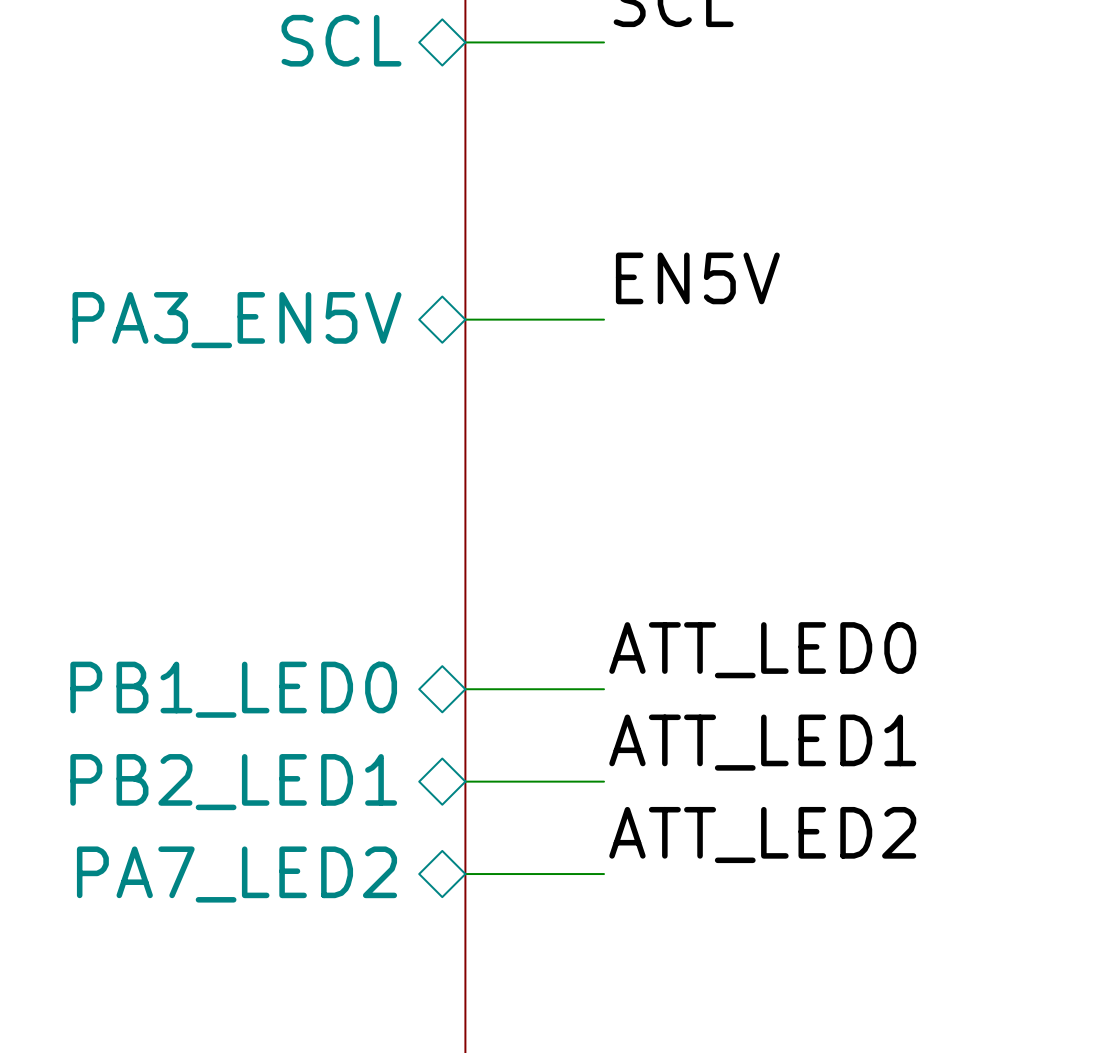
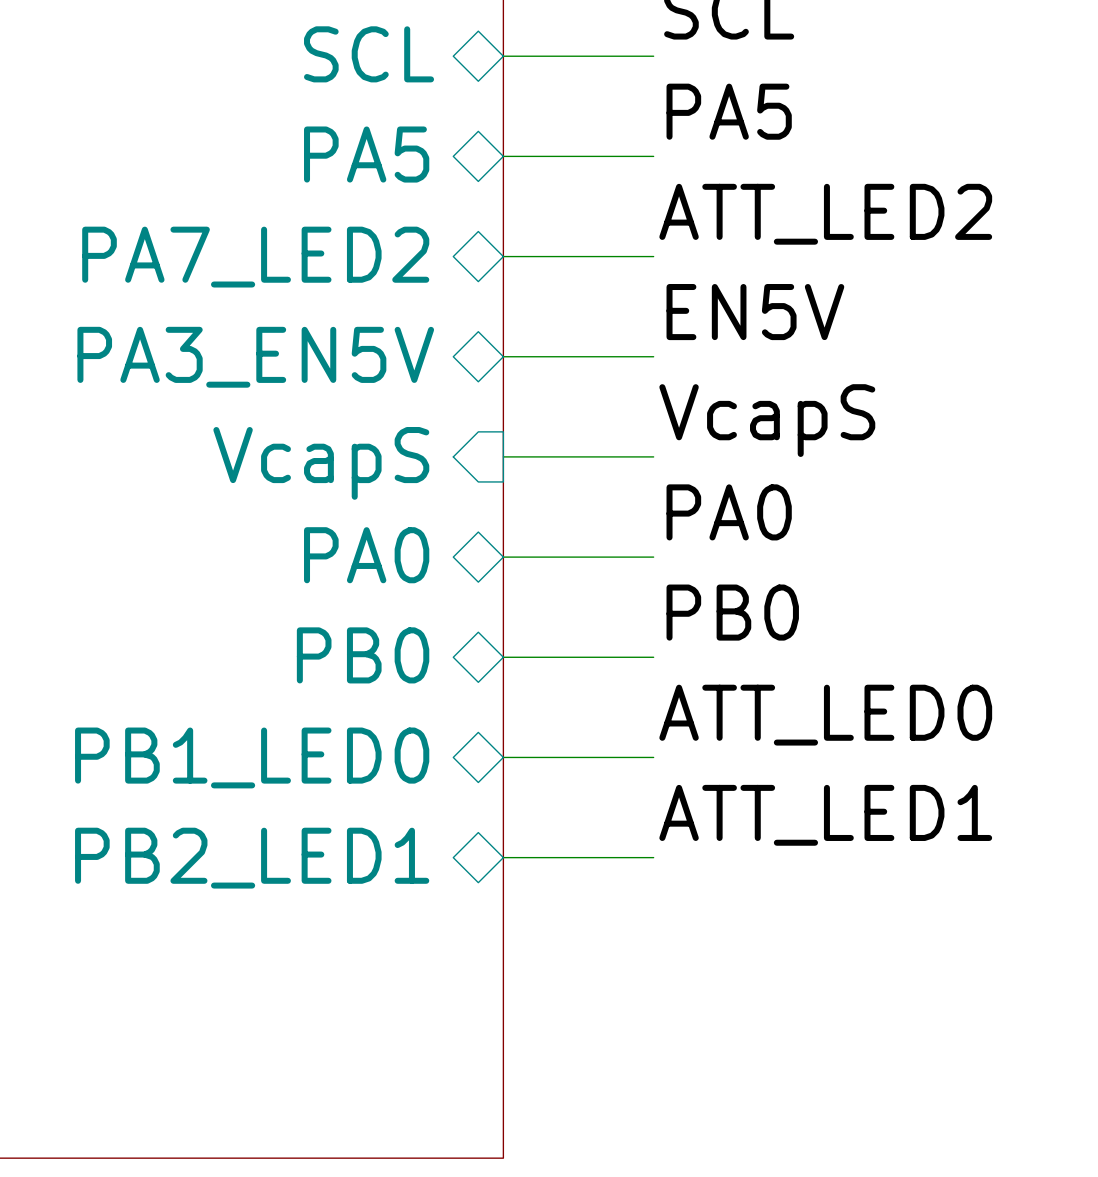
label: none -> PA5 (729, 111)
sheet pin: none -> PA5 (366, 154)
wire: none -> (503, 156) (653, 156)
wire: none -> (503, 256) (653, 256)
label: none -> VcapS (767, 420)
wire: none -> (503, 456) (653, 456)
sheet pin: none -> VcapS (321, 463)
label: none -> PA0 (729, 512)
sheet pin: none -> PA0 (366, 555)
wire: none -> (503, 557) (653, 557)
label: none -> PB0 (732, 612)
sheet pin: none -> PB0 (363, 655)
label position: ATT_LED2 (762, 835) -> ATT_LED2 (825, 214)
sheet pin position: PA7_LED2 (236, 874) -> PA7_LED2 (255, 257)
wire: (465, 874) (604, 874) -> (503, 657) (653, 657)

